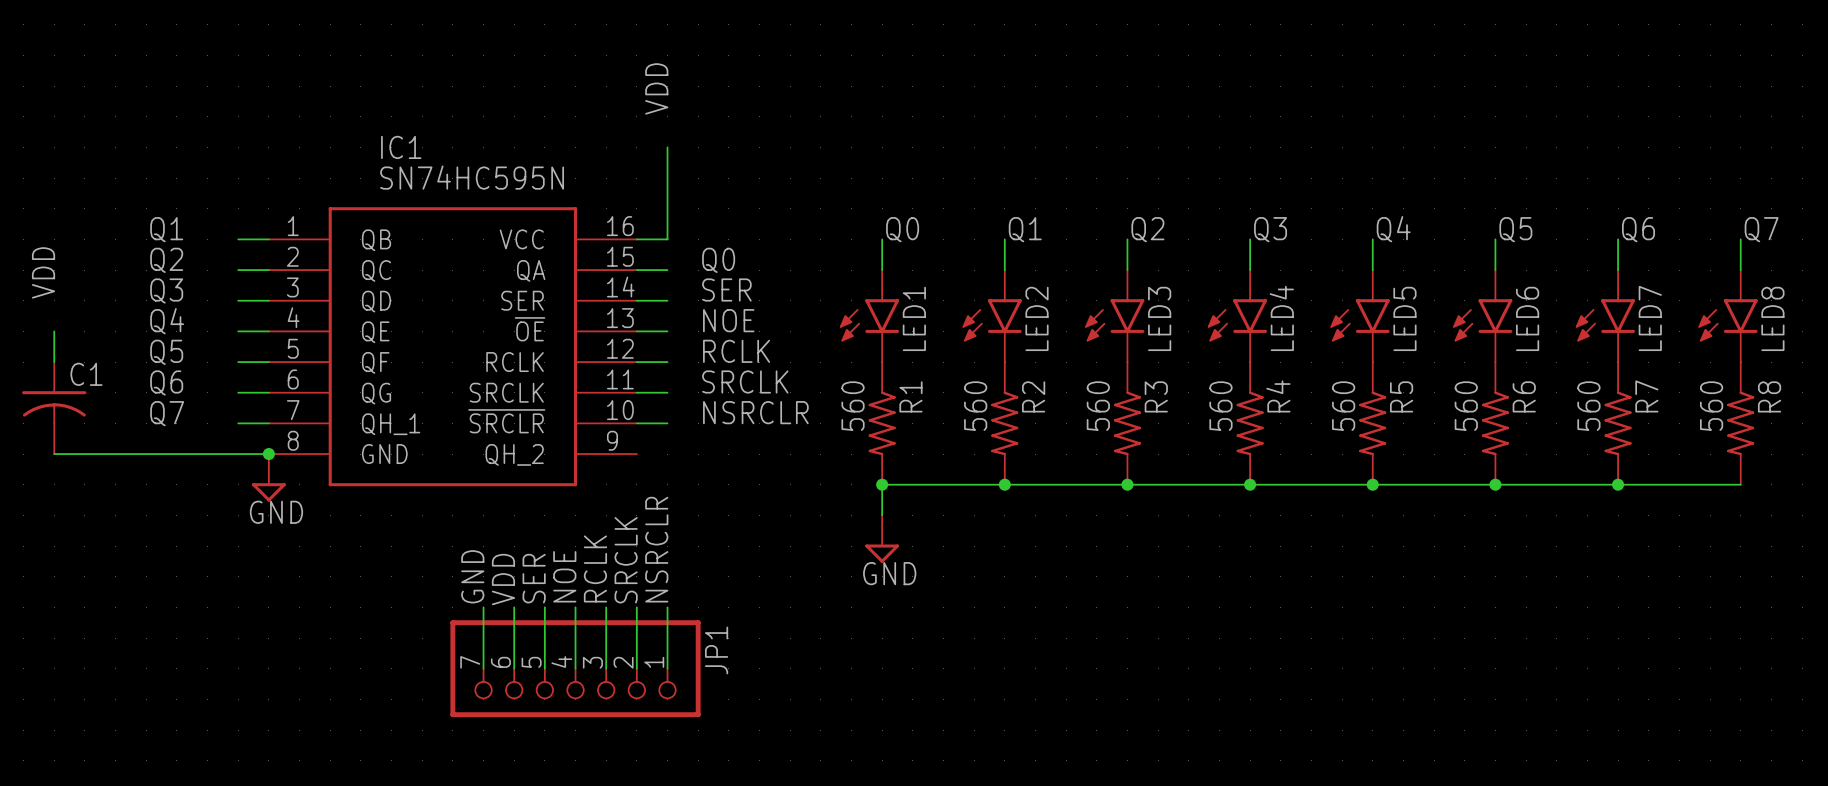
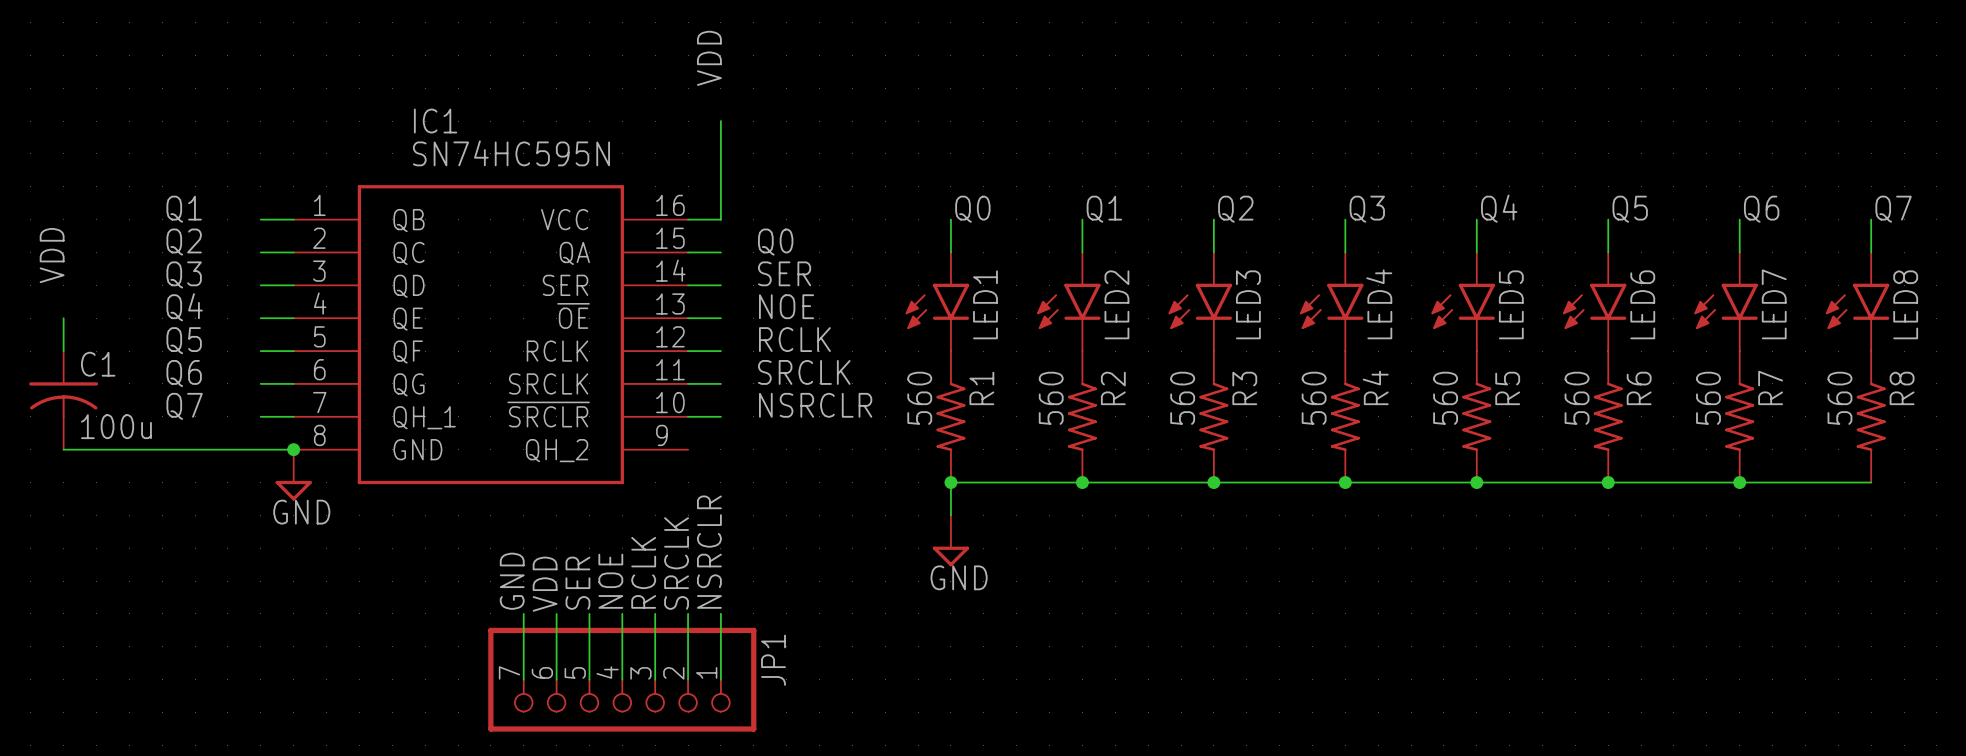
C1 value: none -> 100u (116, 426)

